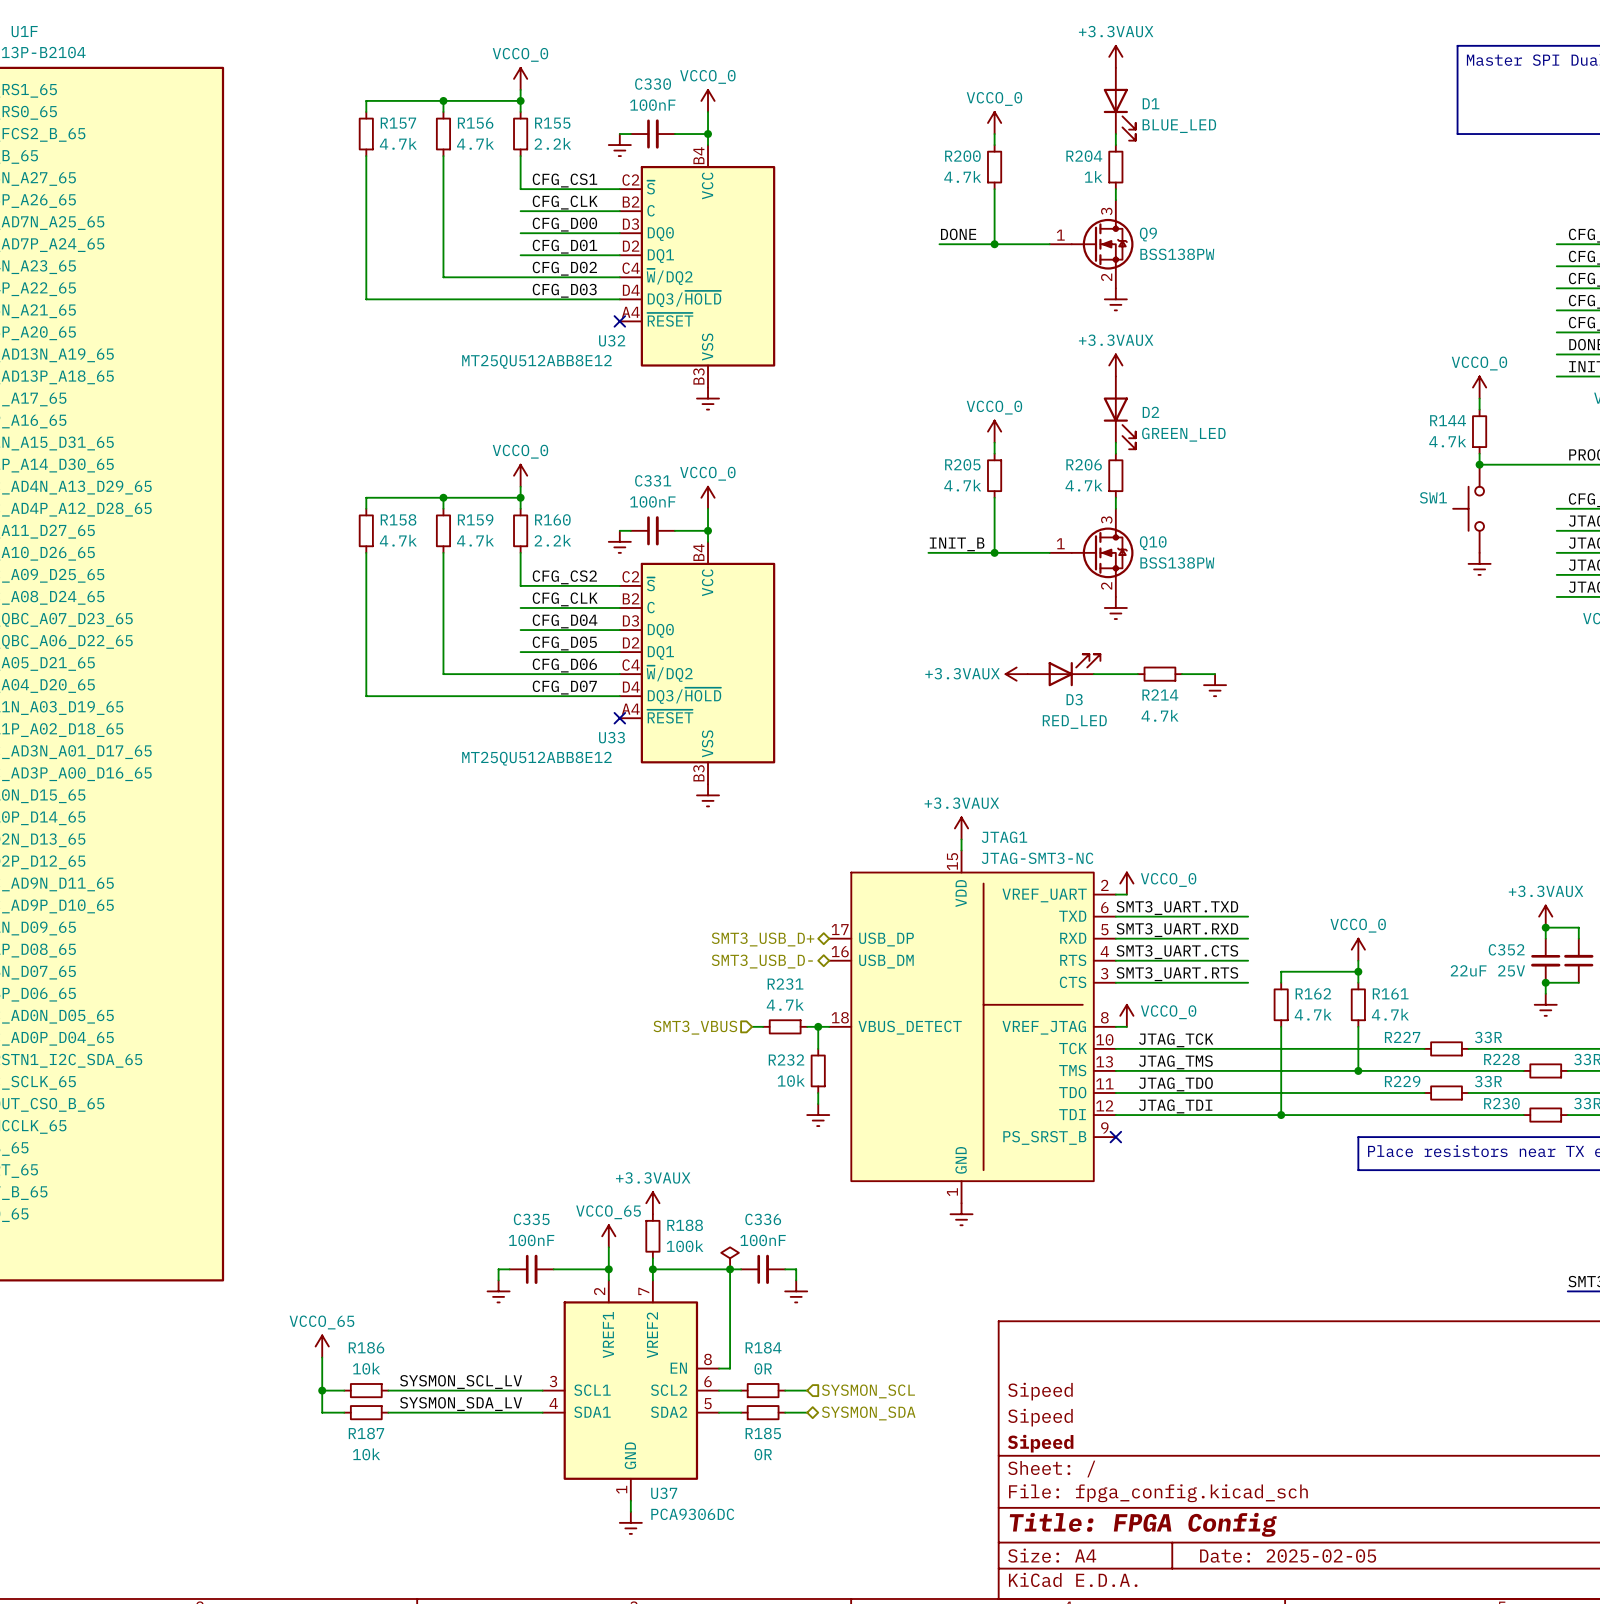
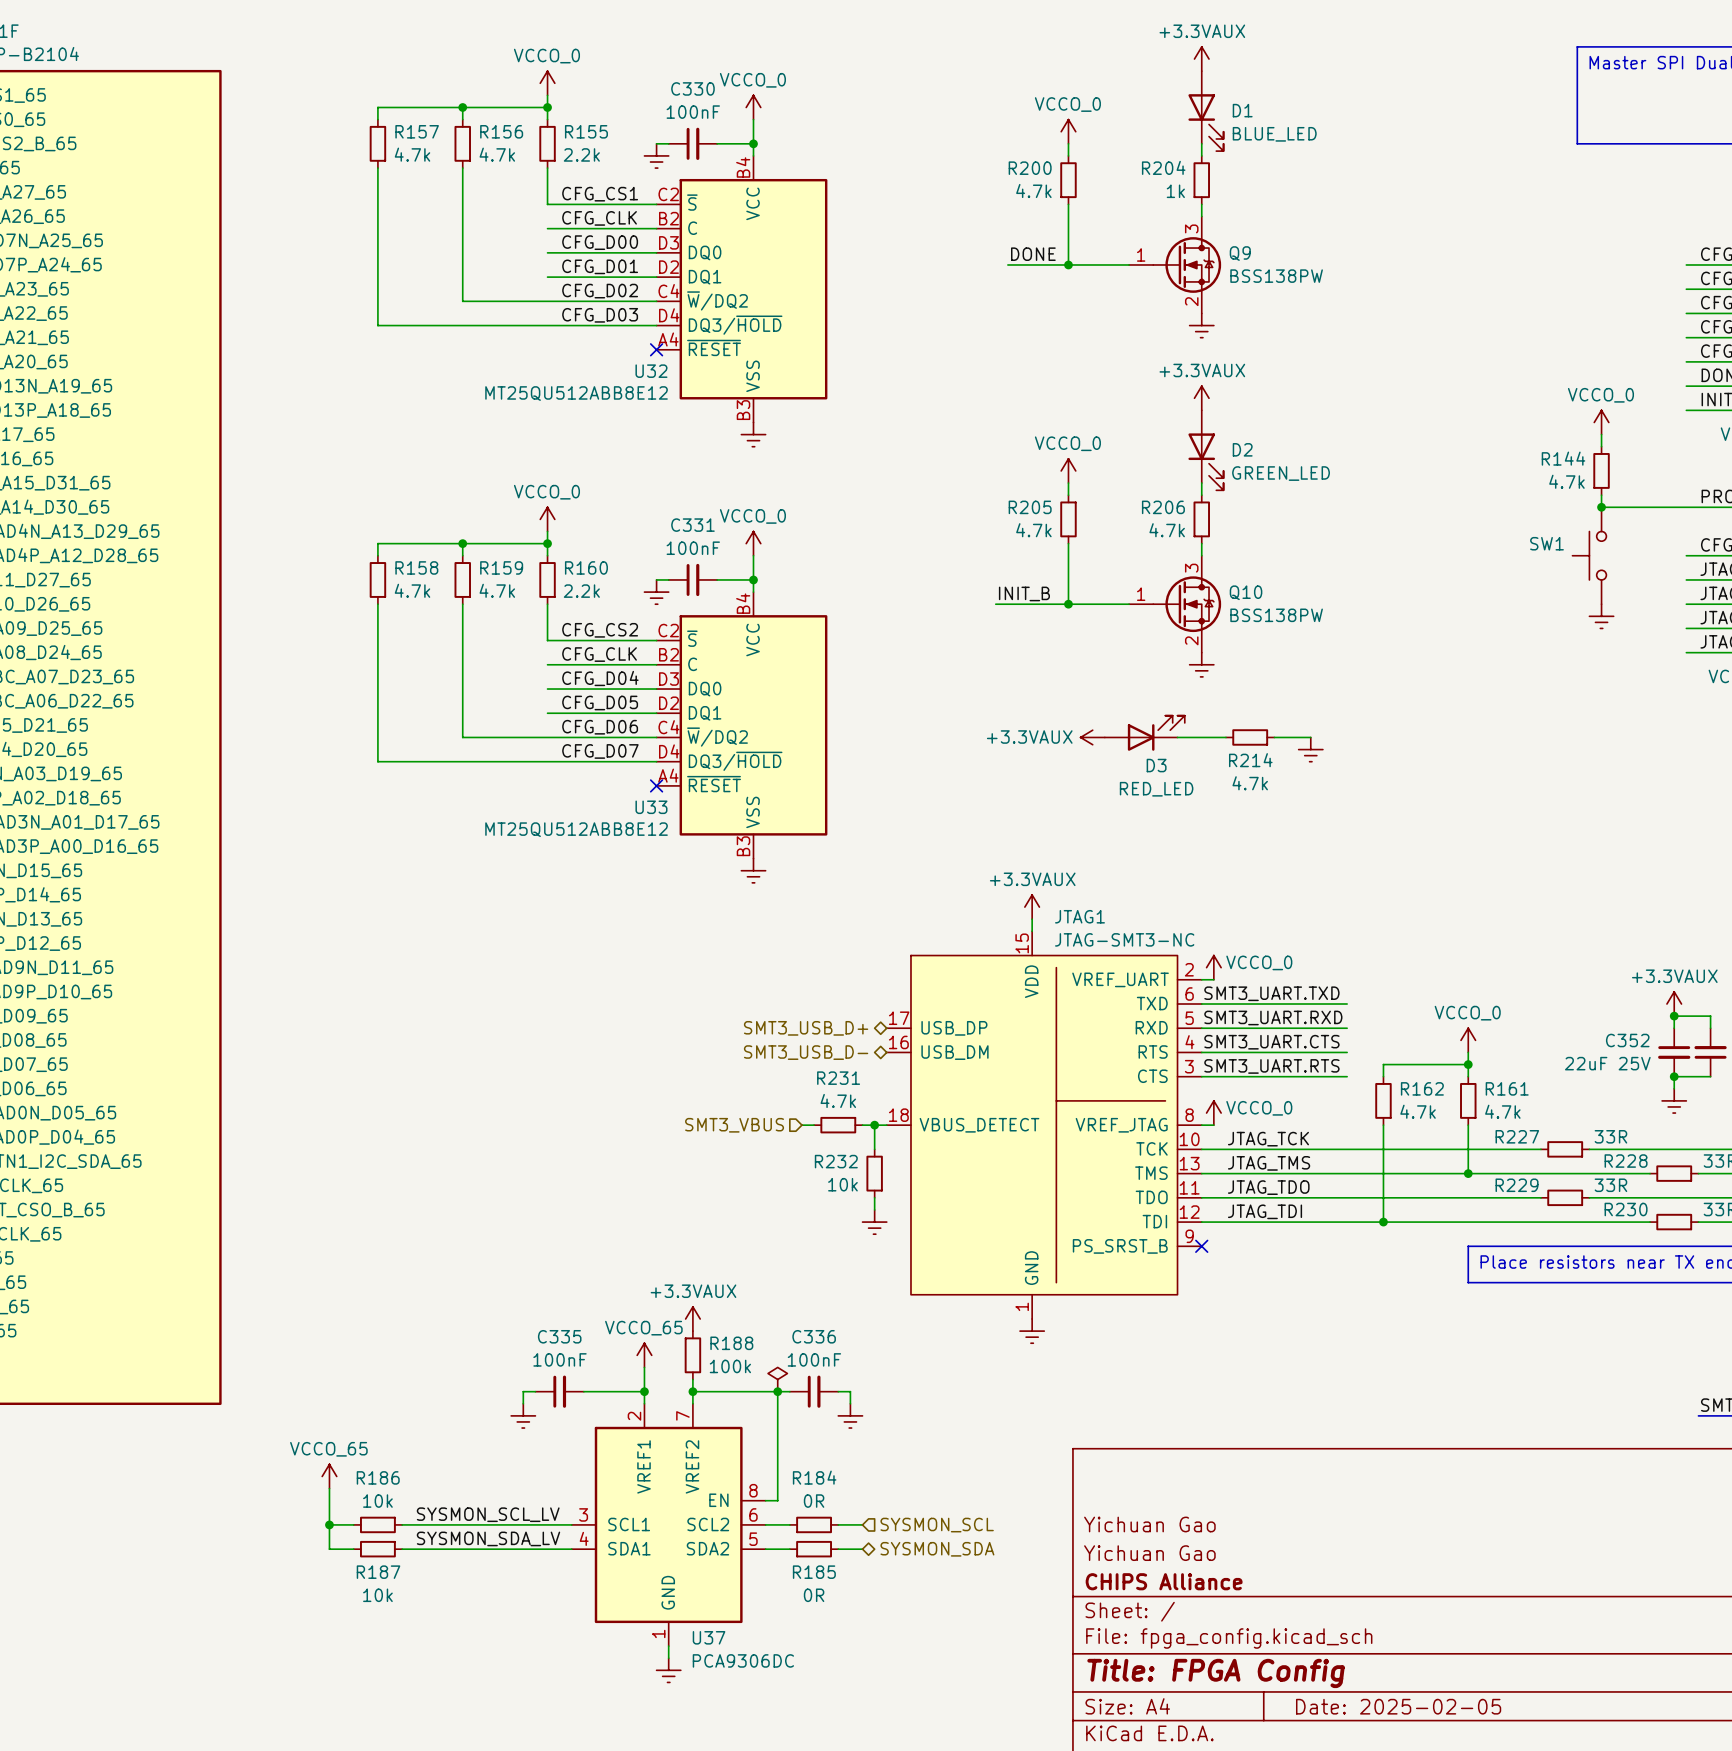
title block: Sipeed (1040, 1391) -> Yichuan Gao (1149, 1524)
title block: Sipeed (1040, 1417) -> Yichuan Gao (1149, 1553)
title block: Sipeed (1040, 1443) -> CHIPS Alliance (1164, 1581)

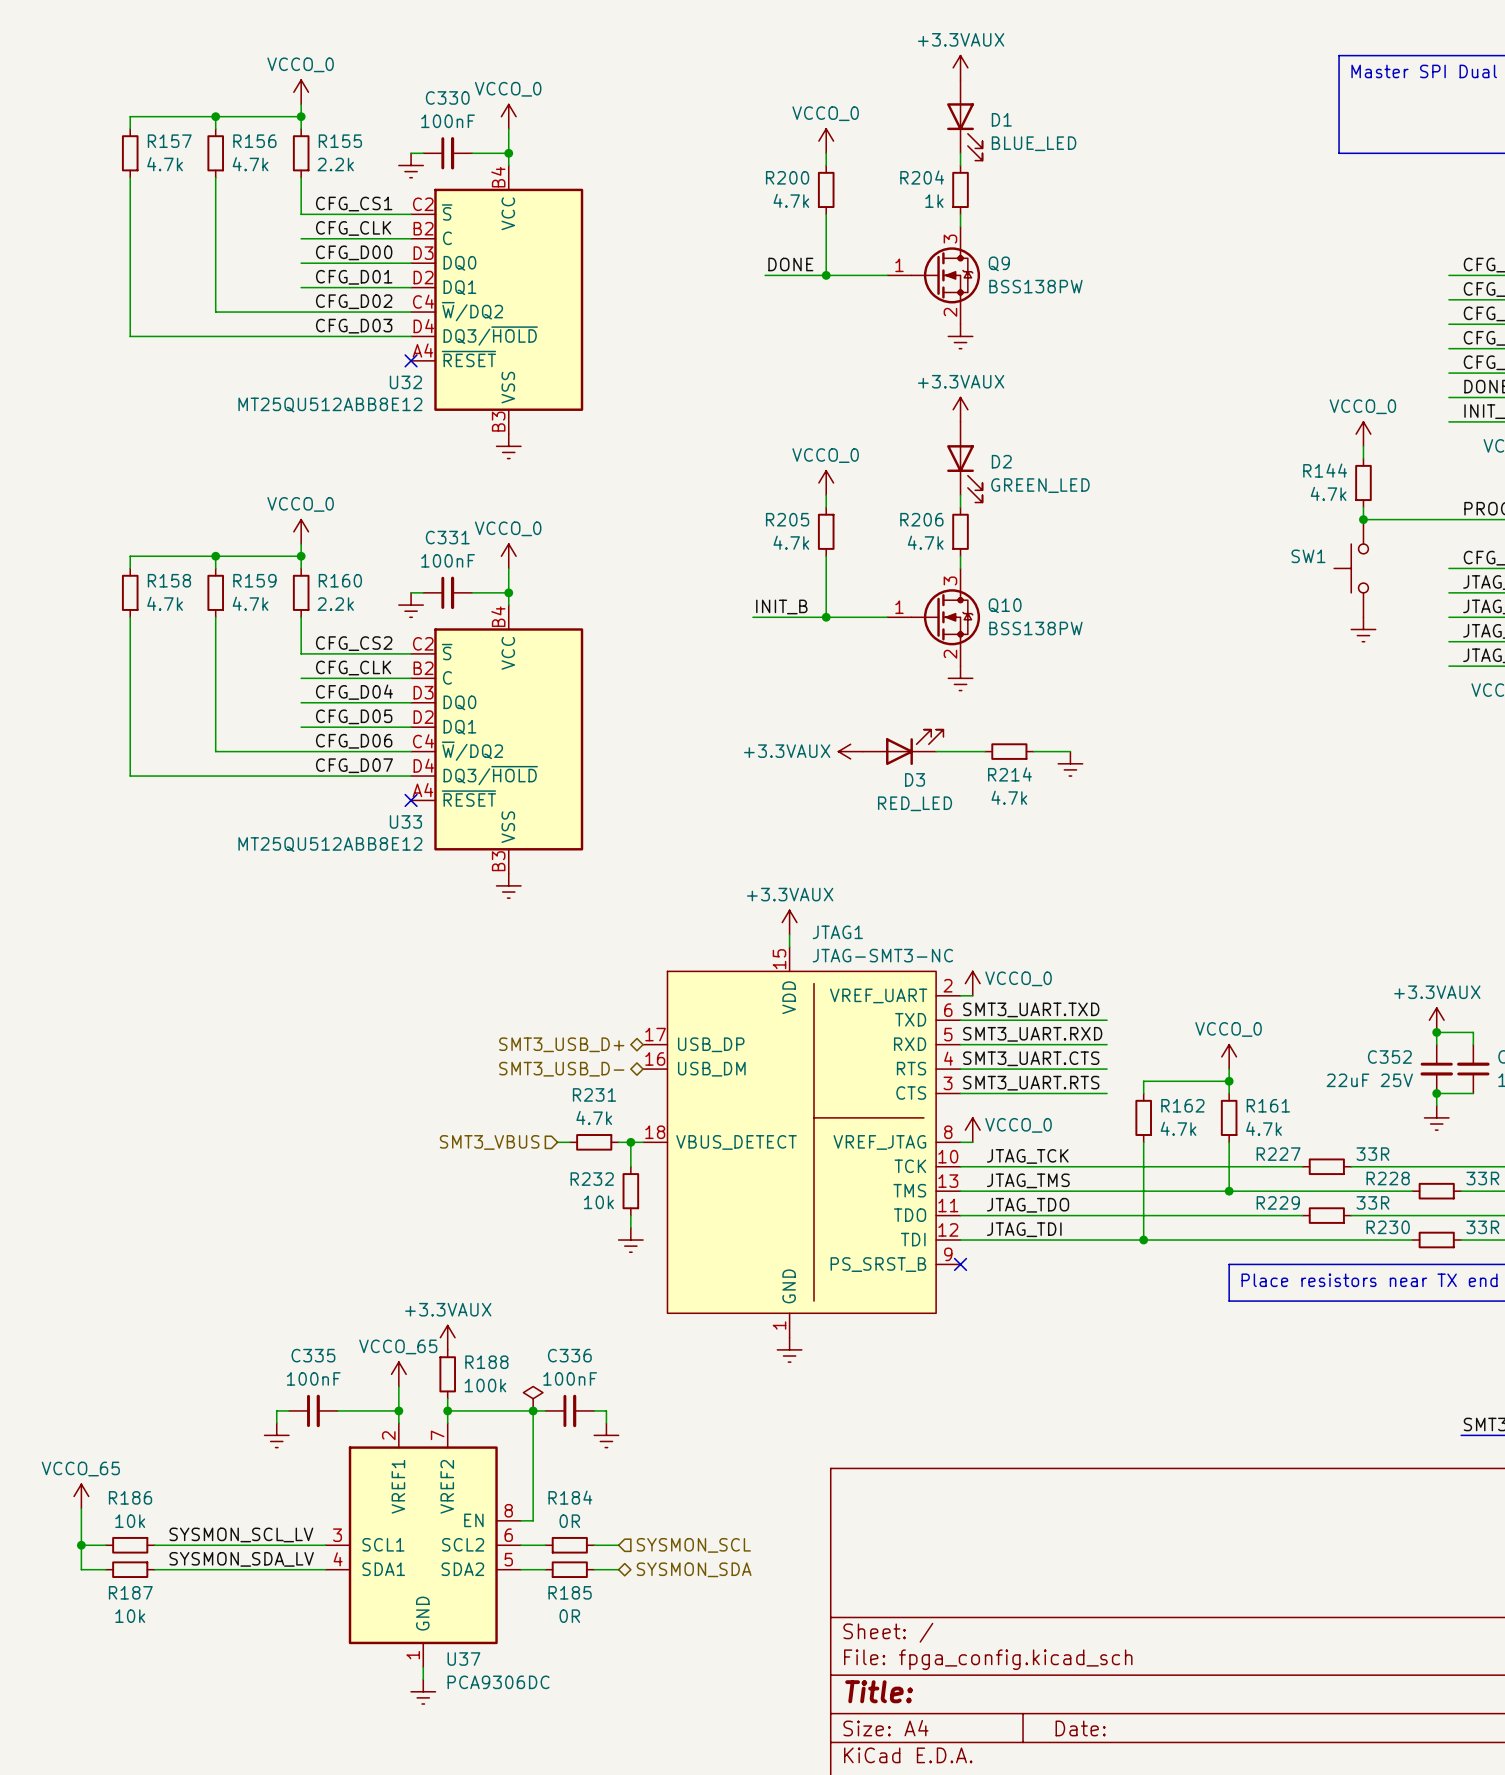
title block: Yichuan Gao (1149, 1524) -> none
title block: Yichuan Gao (1149, 1553) -> none
title block: CHIPS Alliance (1164, 1581) -> none
title block: Title: FPGA Config (1216, 1673) -> Title: (879, 1691)
title block: Date: 2025-02-05 (1398, 1706) -> Date: (1080, 1728)

